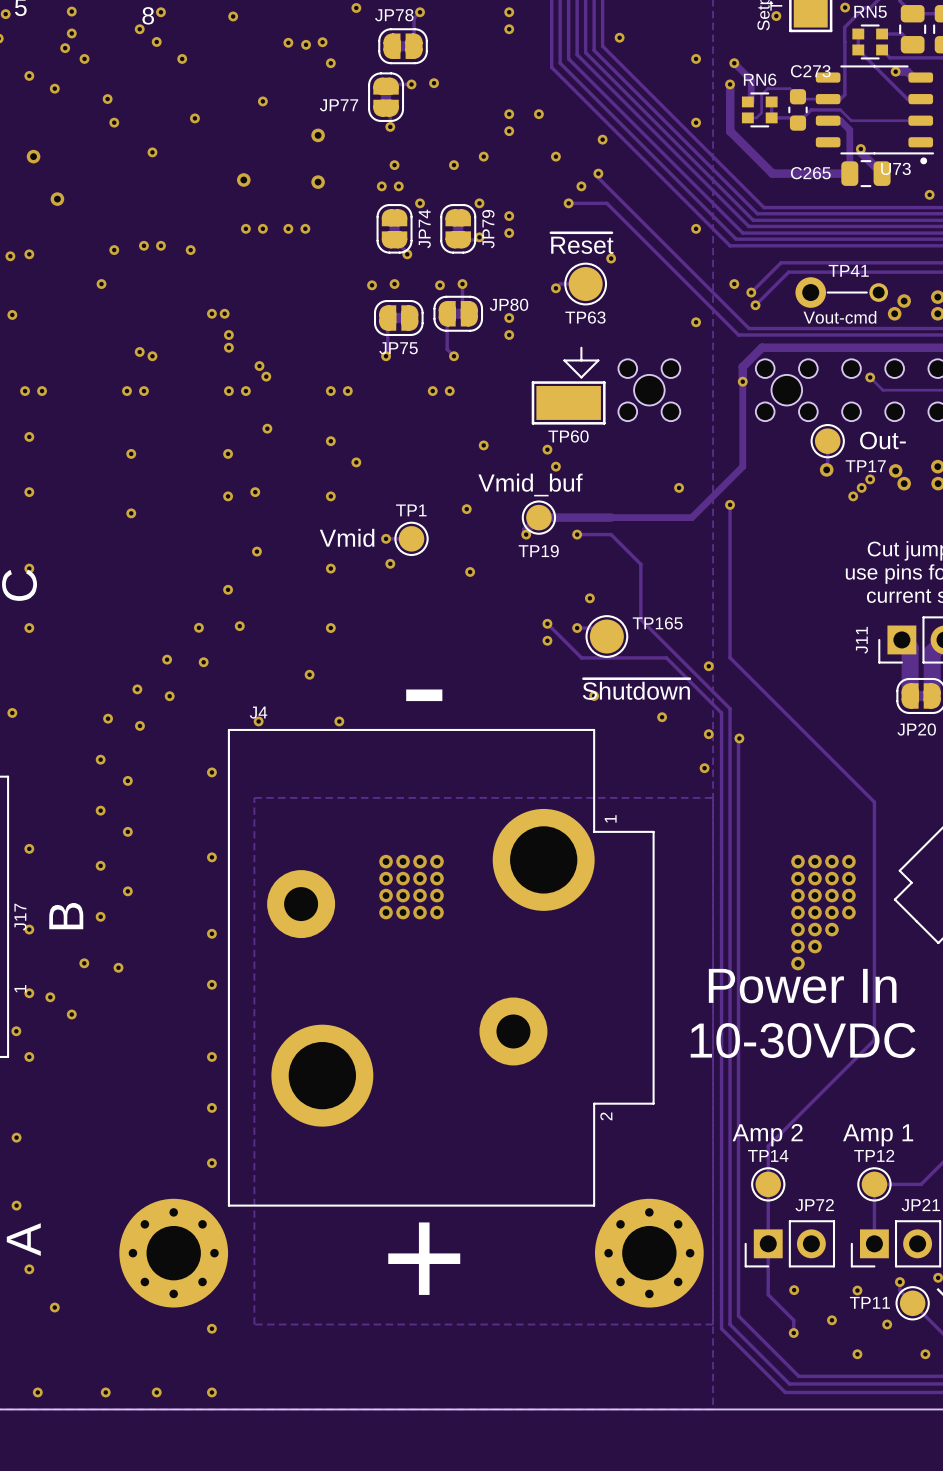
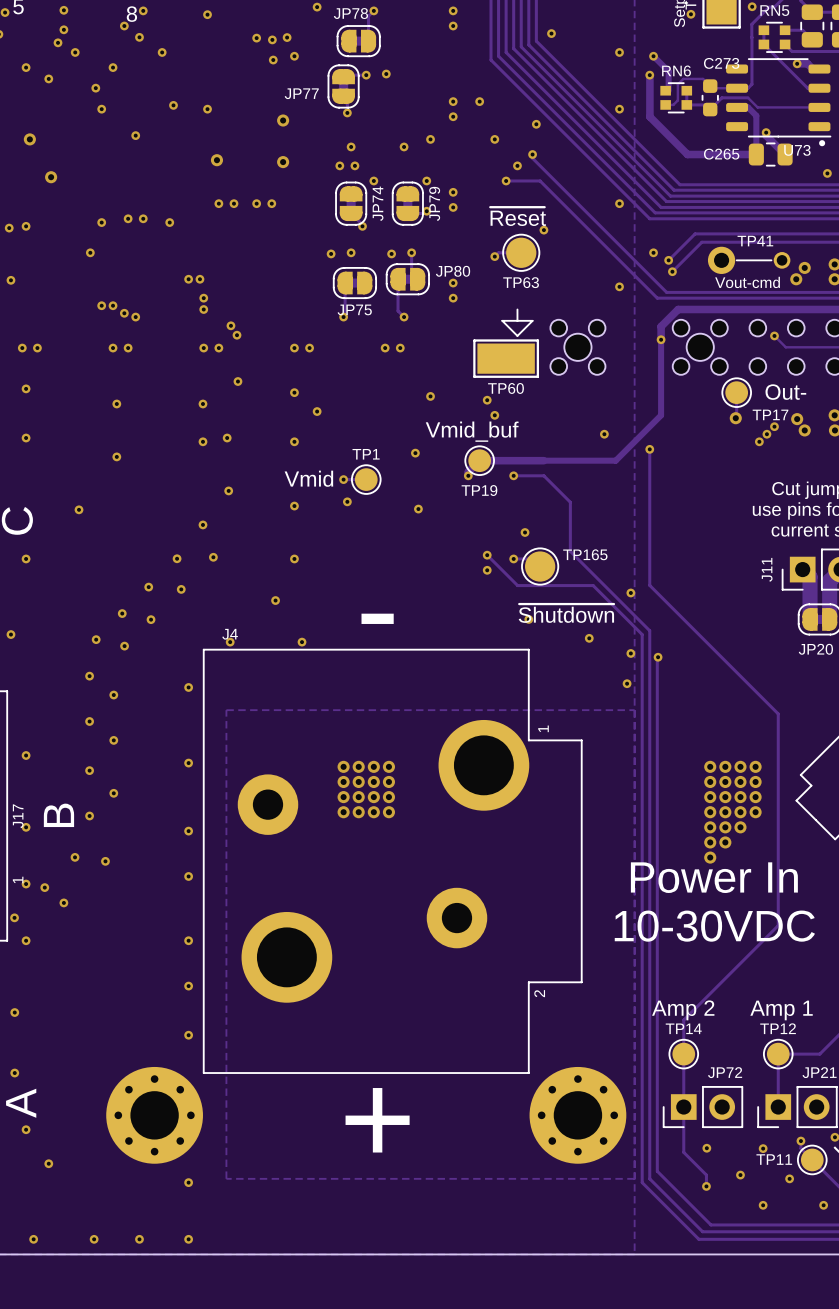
via: none -> (273, 60)
via: none -> (113, 67)
via: (262, 101) -> none
via: none -> (207, 109)
via: none -> (101, 305)
via: none -> (113, 305)
via position: (29, 568) -> (79, 509)

